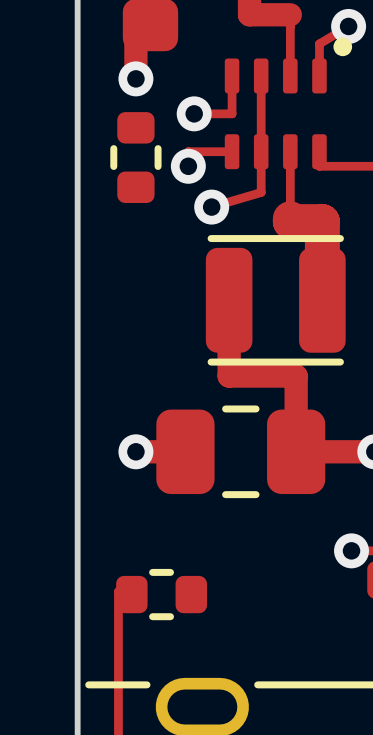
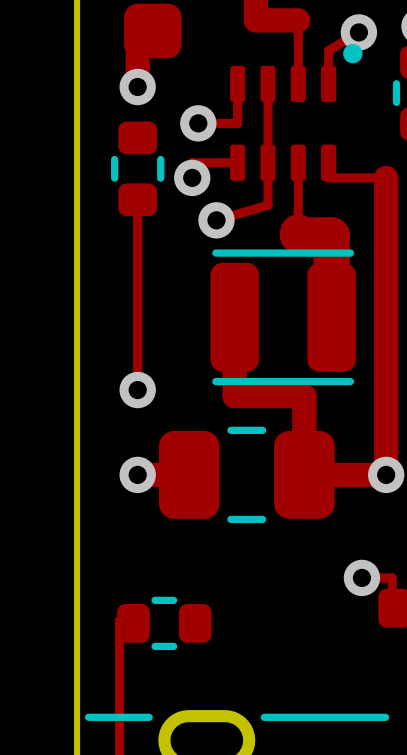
track: none -> (137, 202) (137, 390)
via: none -> (137, 390)

